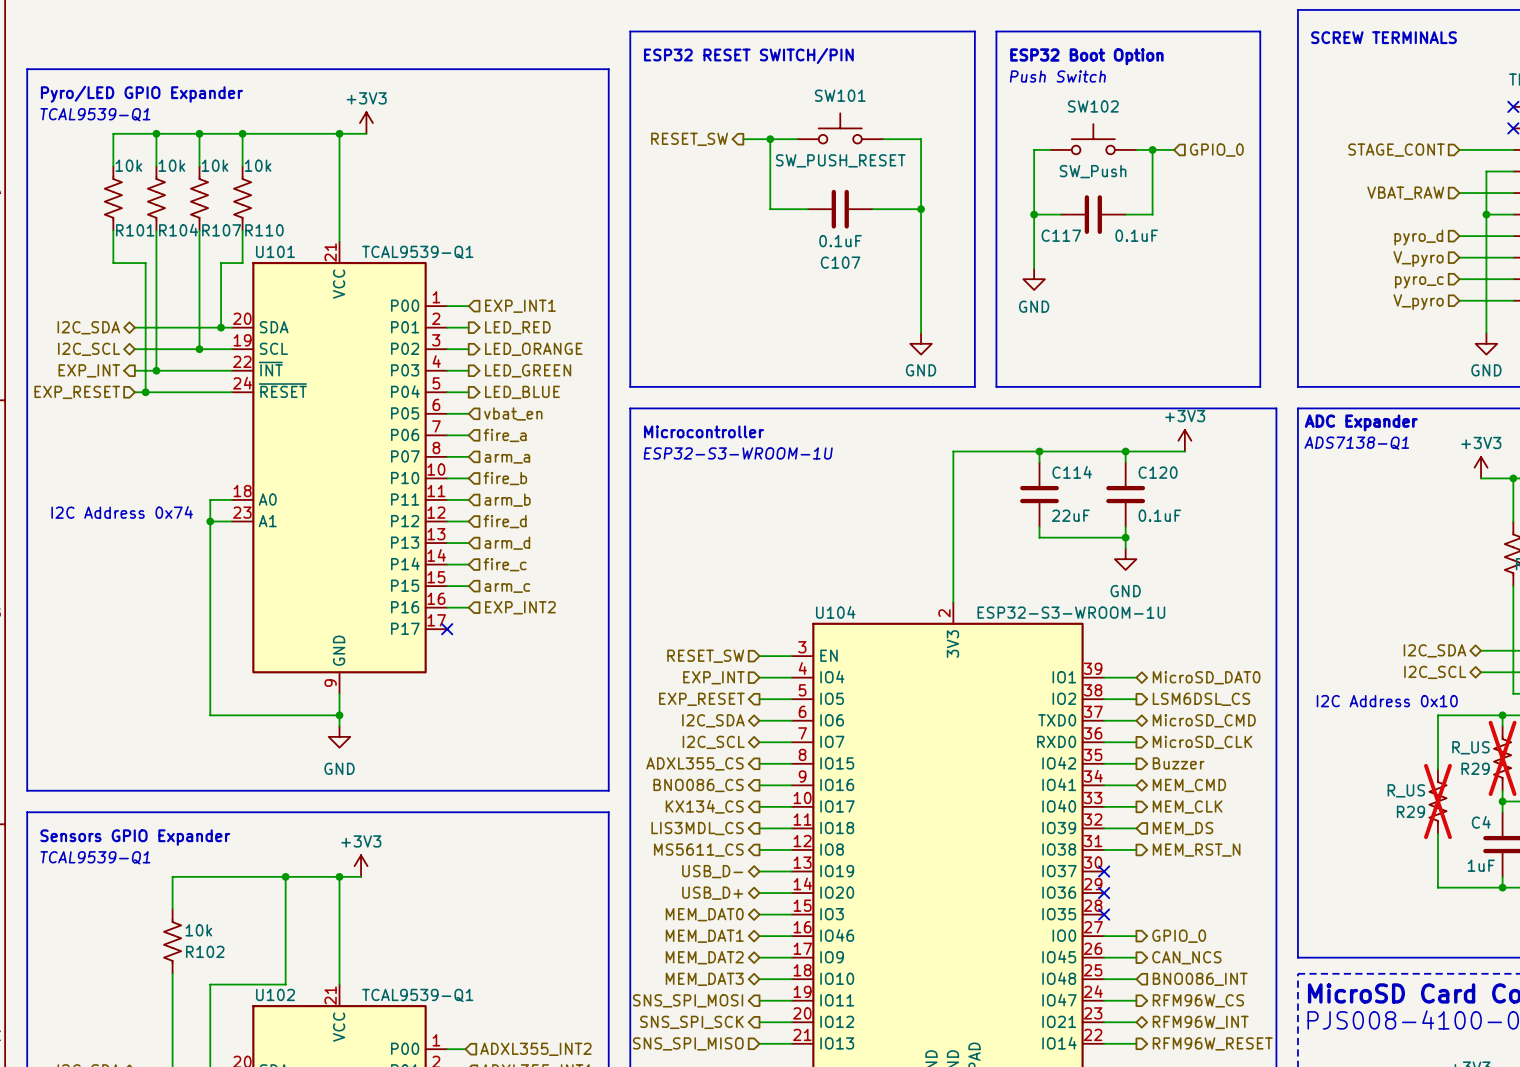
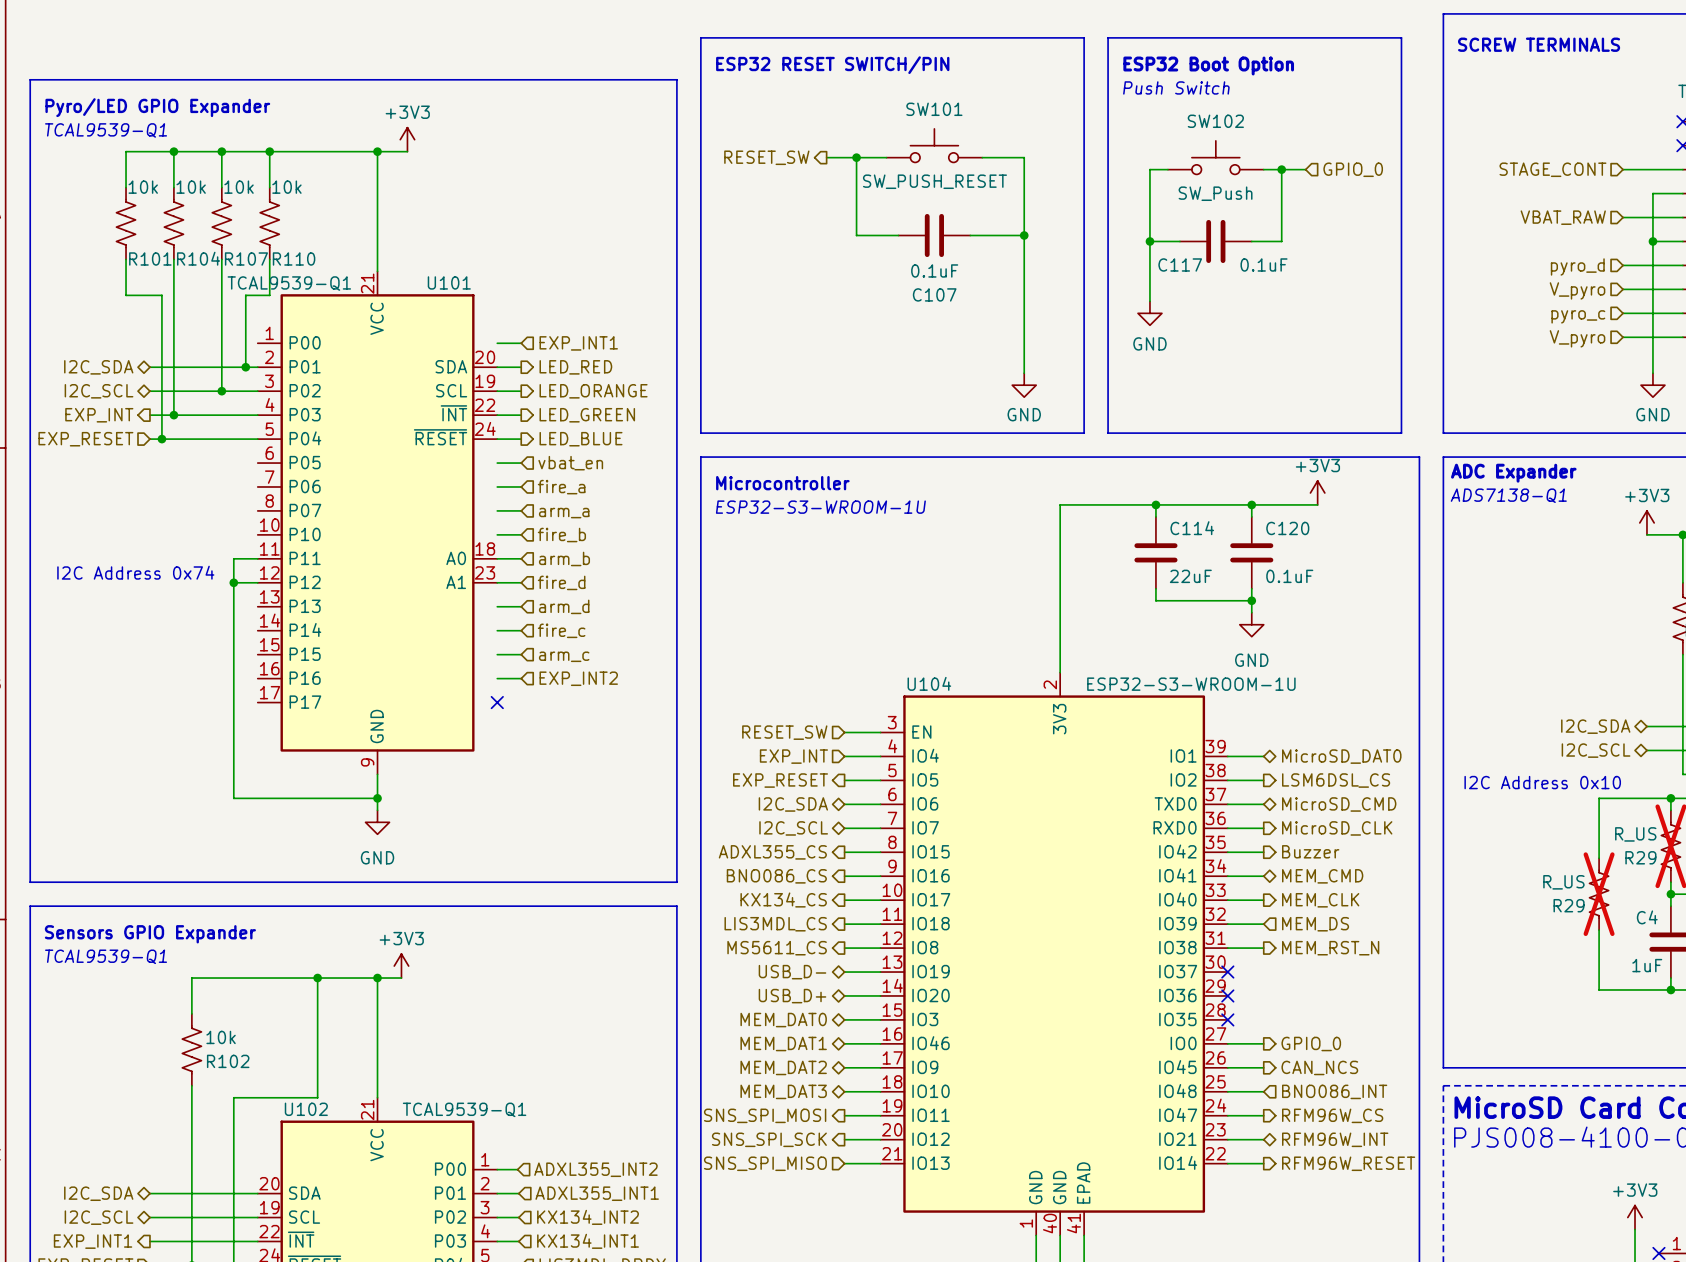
U101 flip: as is (339, 467) -> left-right (377, 522)

